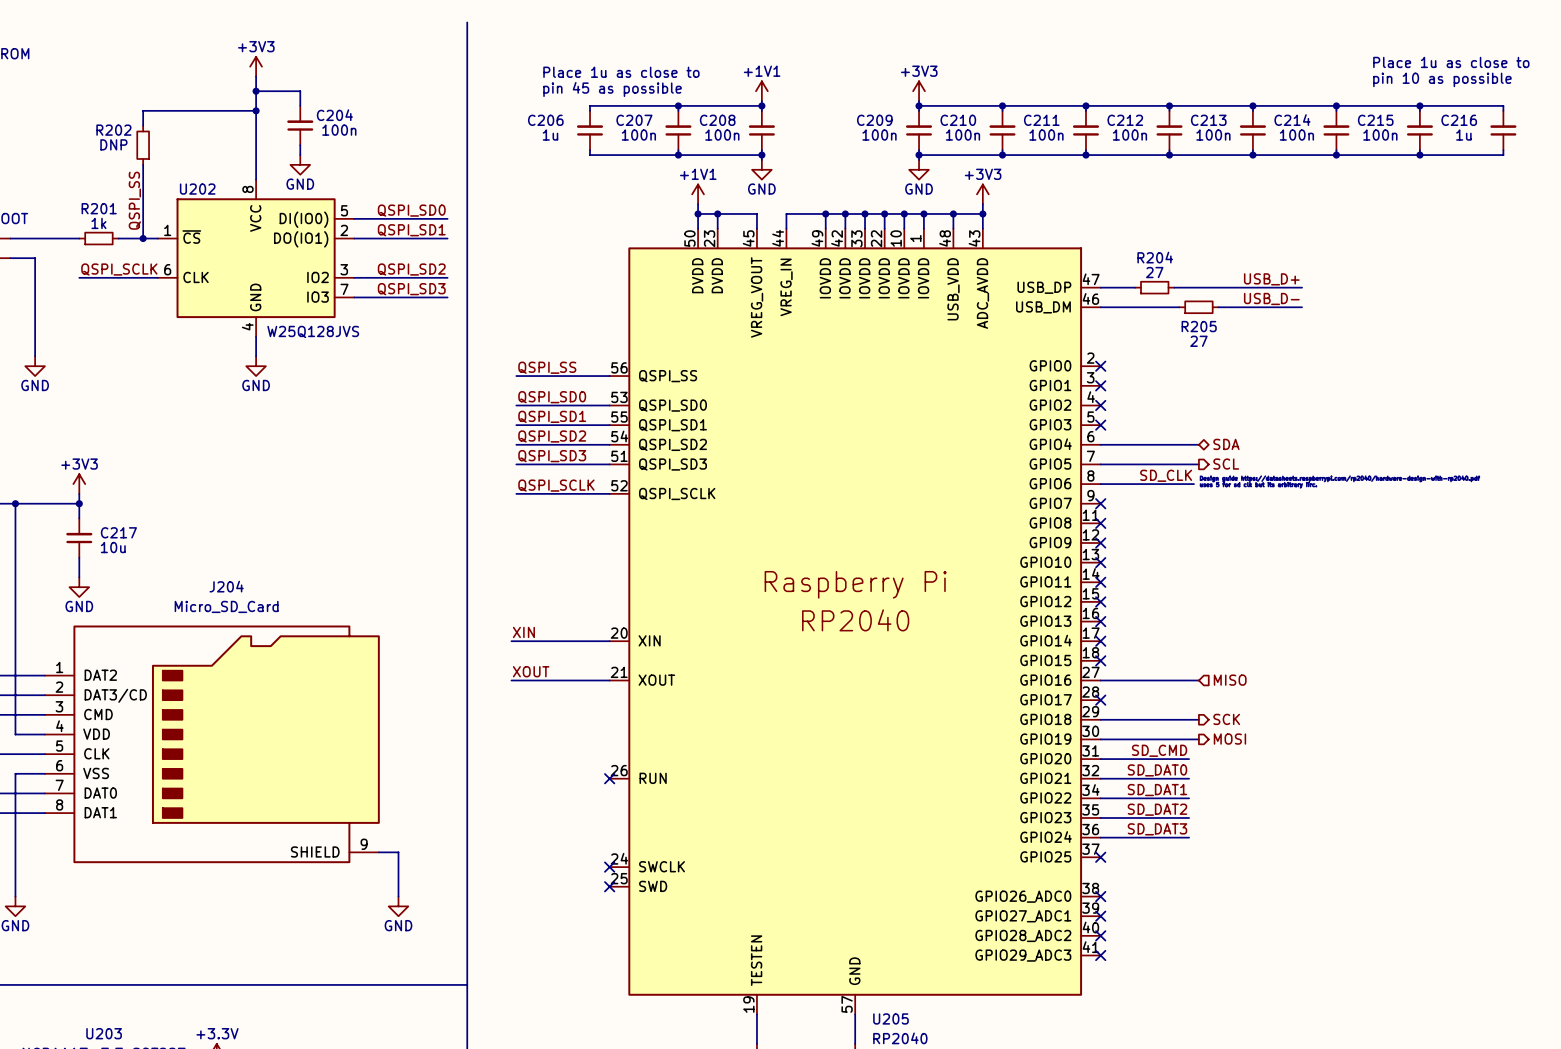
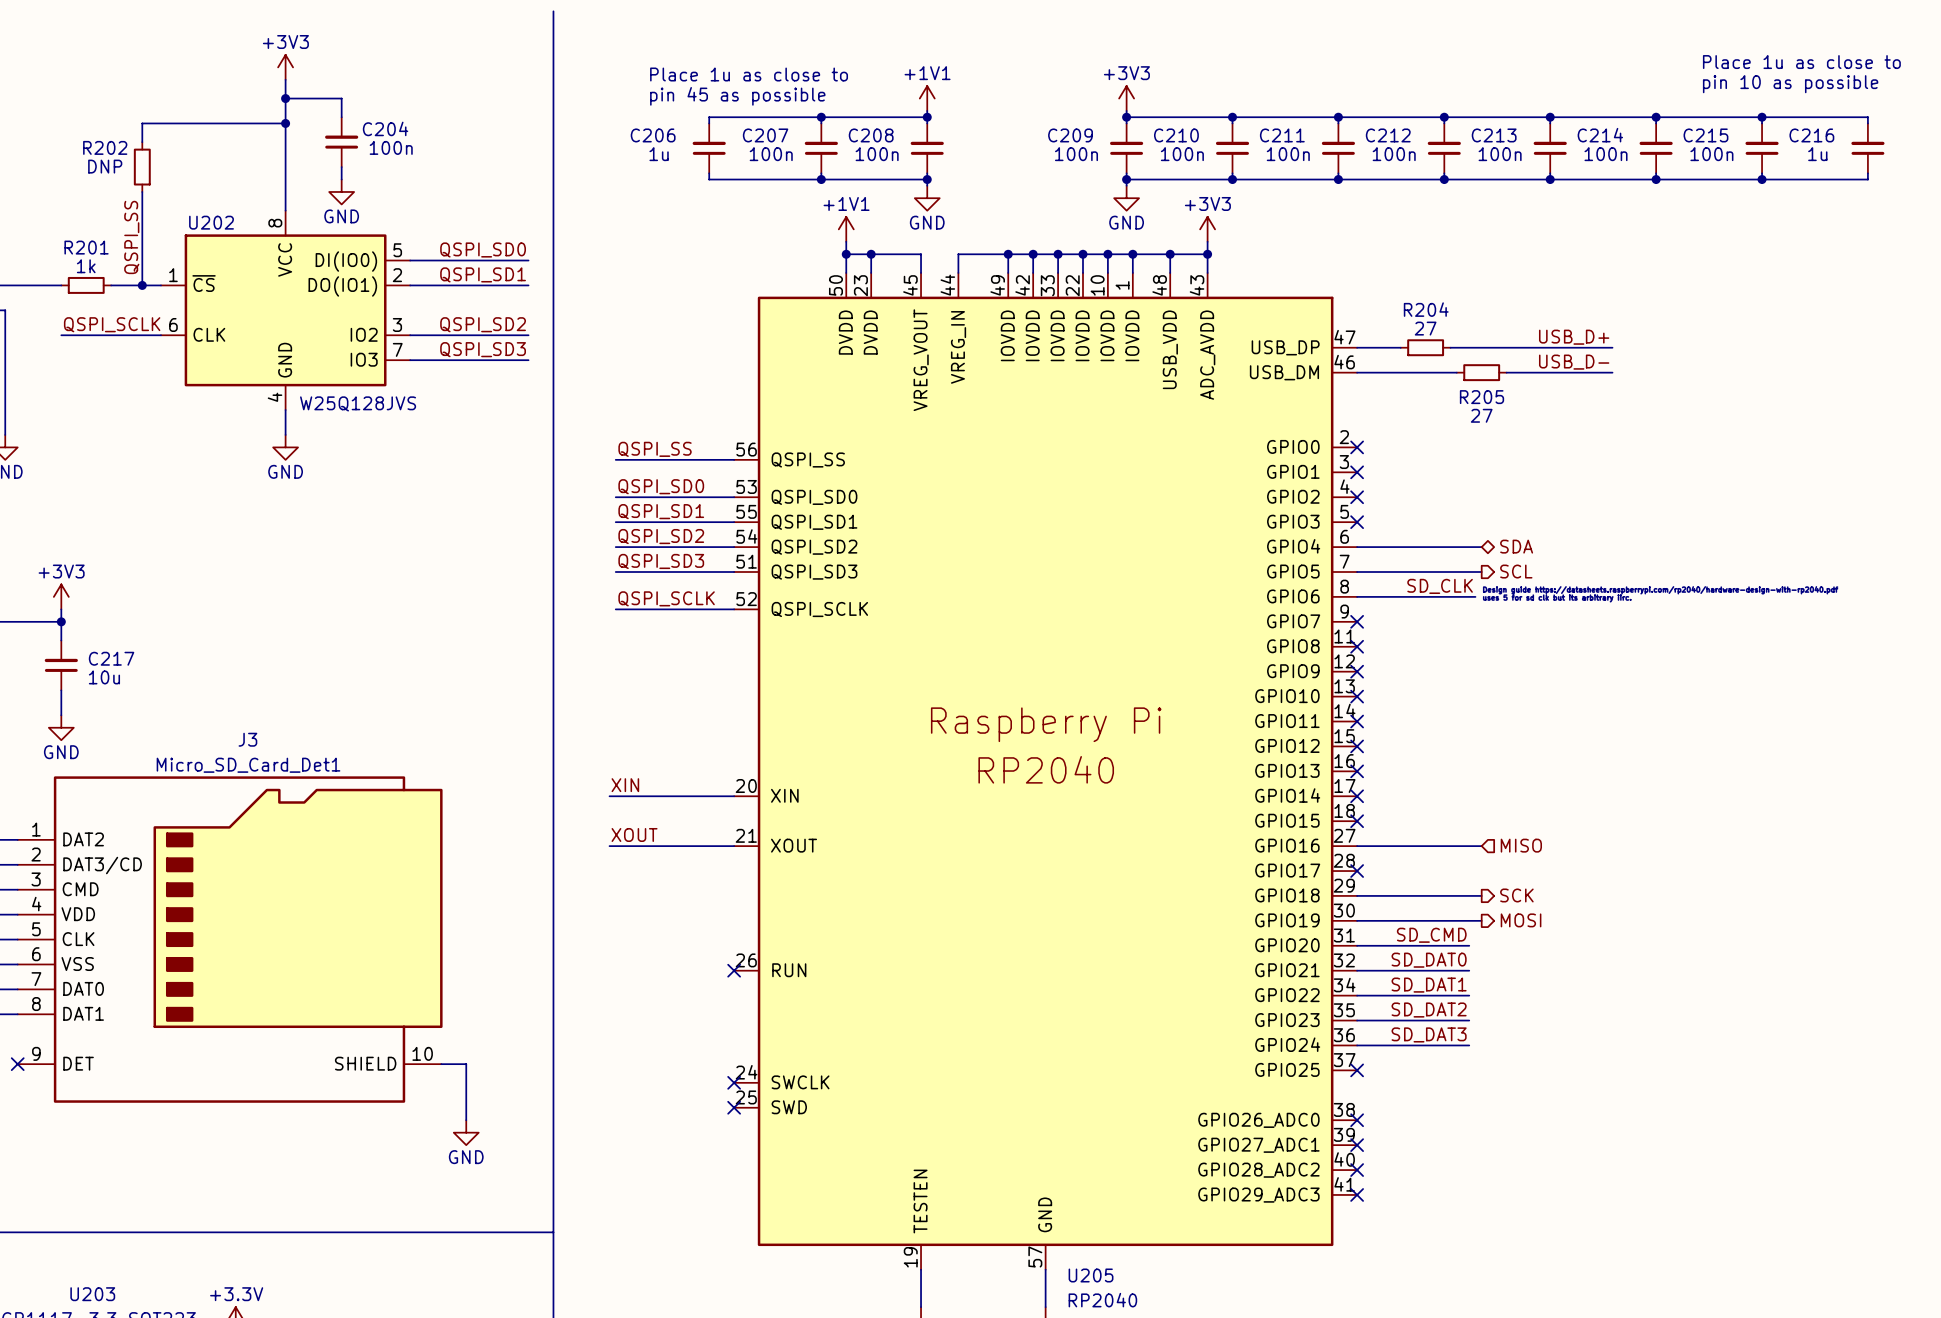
J204: Micro_SD_Card (212, 744) -> none
J3: none -> Micro_SD_Card_Det1 (230, 939)
no-connect mark: none -> (17, 1064)

